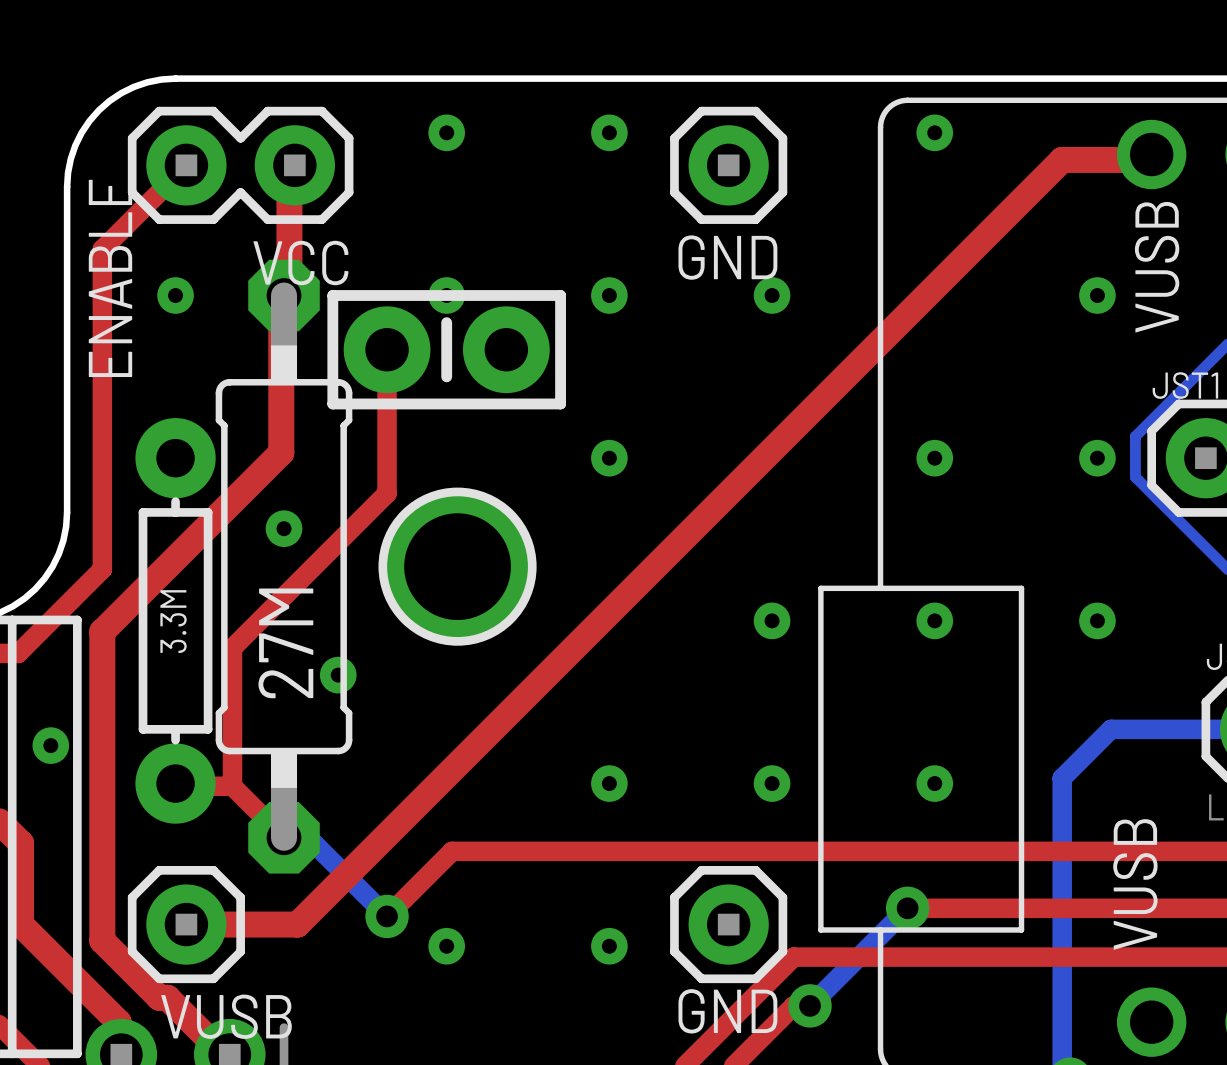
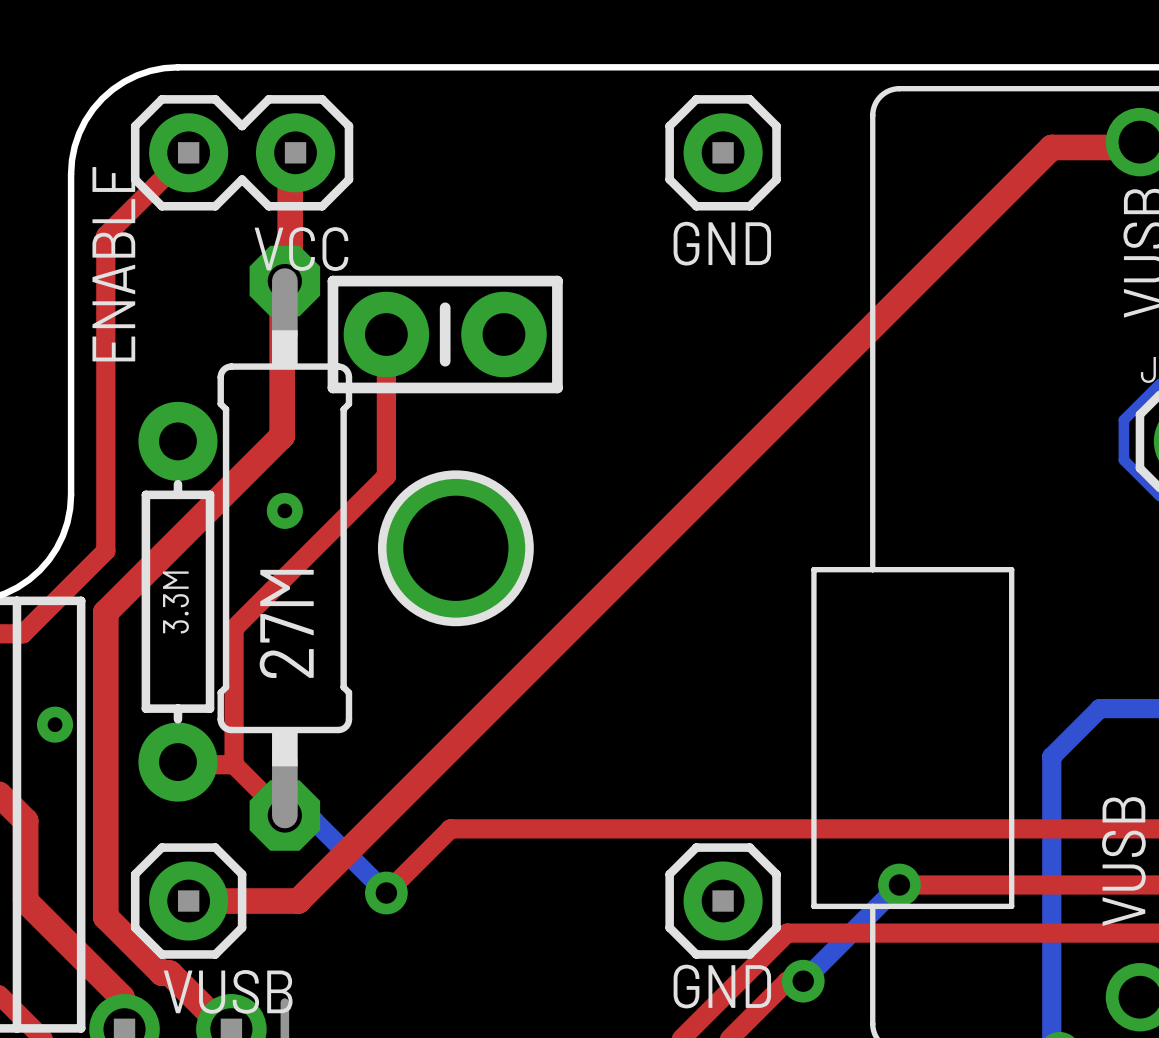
via: (446, 132) -> none
via: (609, 132) -> none
via: (934, 132) -> none
via: (175, 295) -> none
via: (446, 295) -> none
via: (609, 295) -> none
via: (772, 295) -> none
via: (1097, 295) -> none
via: (609, 458) -> none
via: (934, 458) -> none
via: (1097, 458) -> none
via: (772, 620) -> none
via: (934, 620) -> none
via: (1097, 620) -> none
via: (338, 675) -> none
via: (609, 783) -> none
via: (772, 783) -> none
via: (934, 783) -> none
via: (446, 946) -> none
via: (609, 946) -> none

